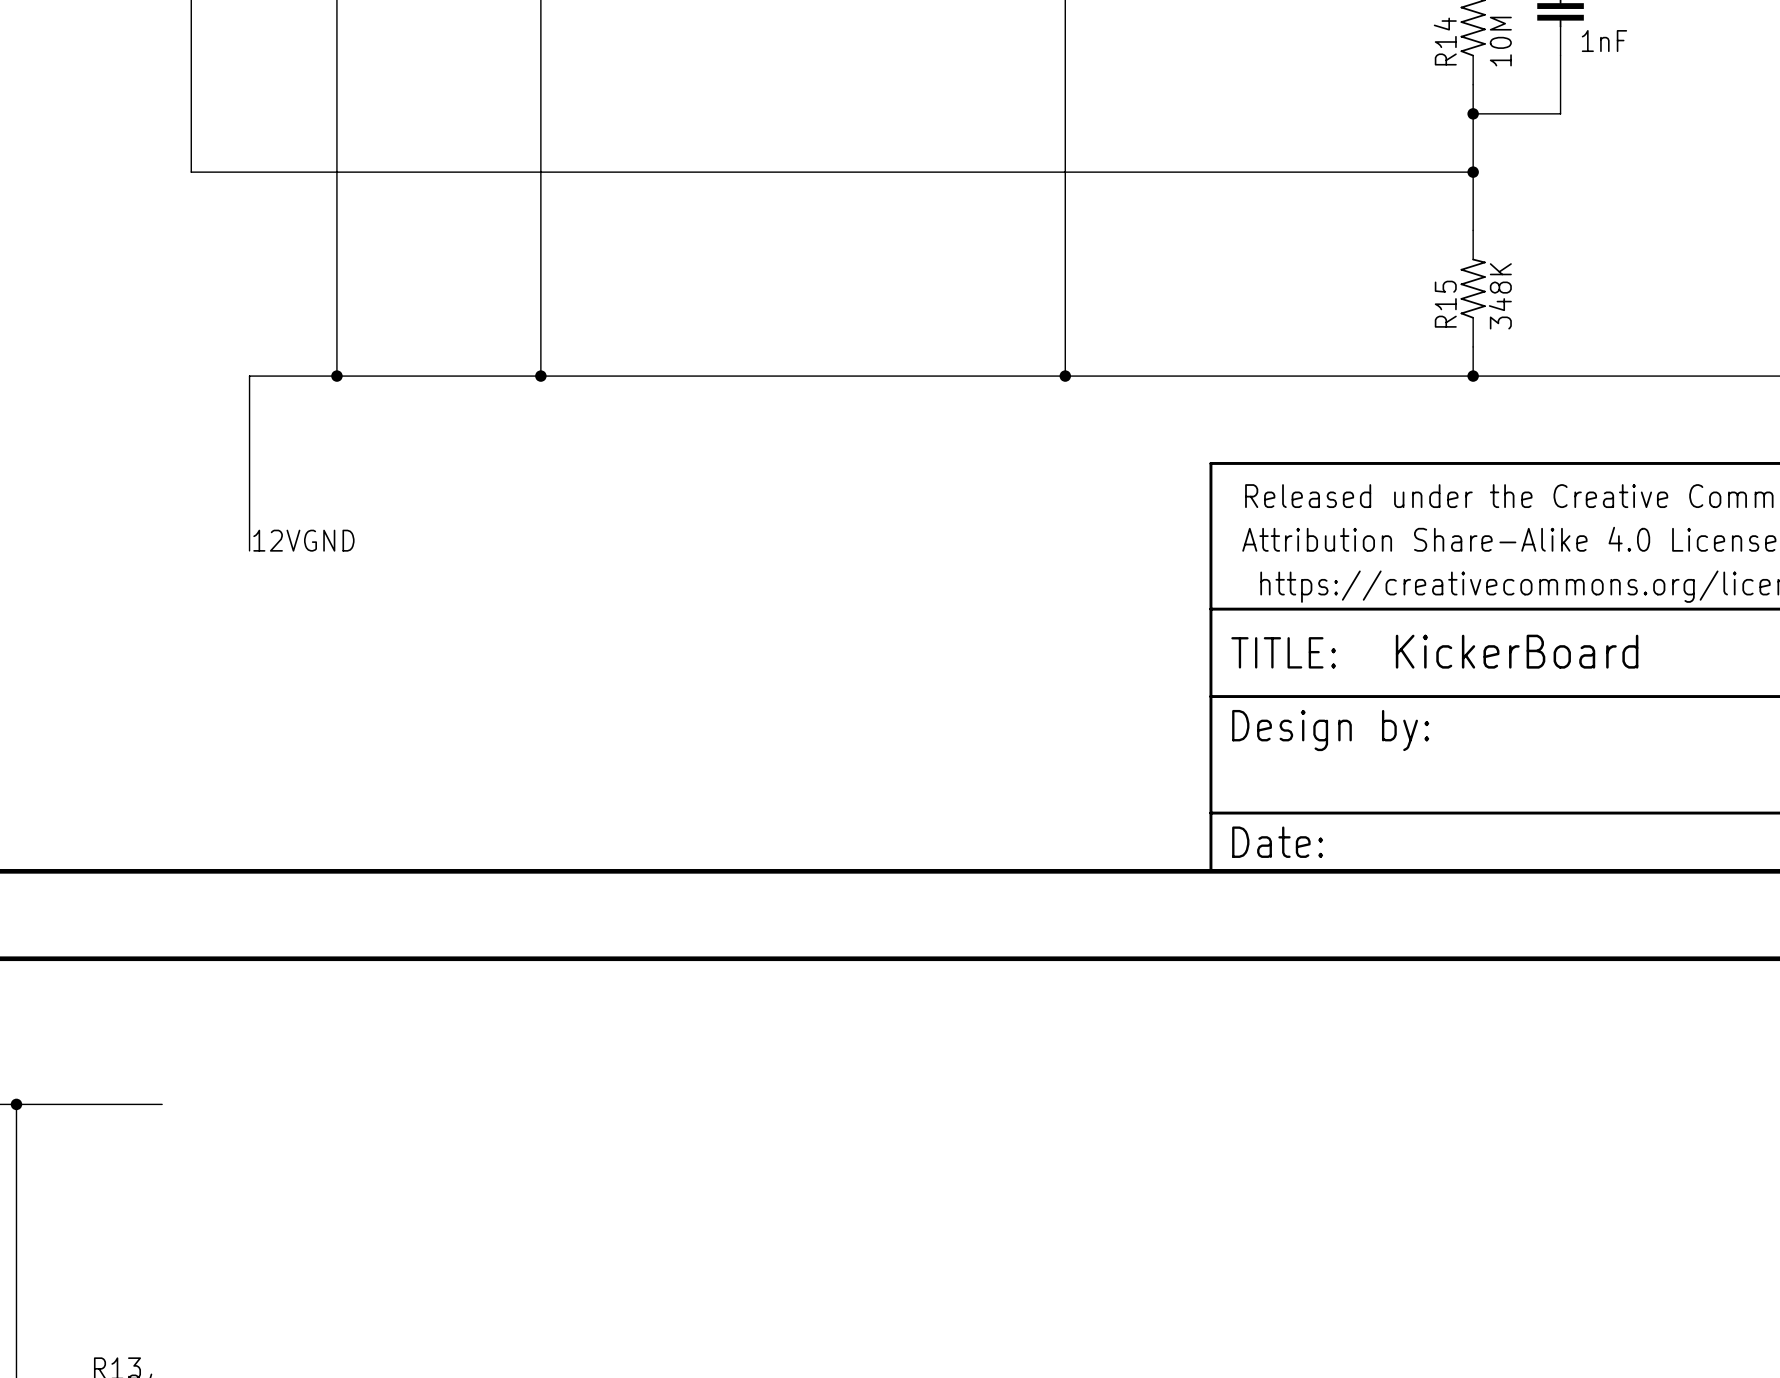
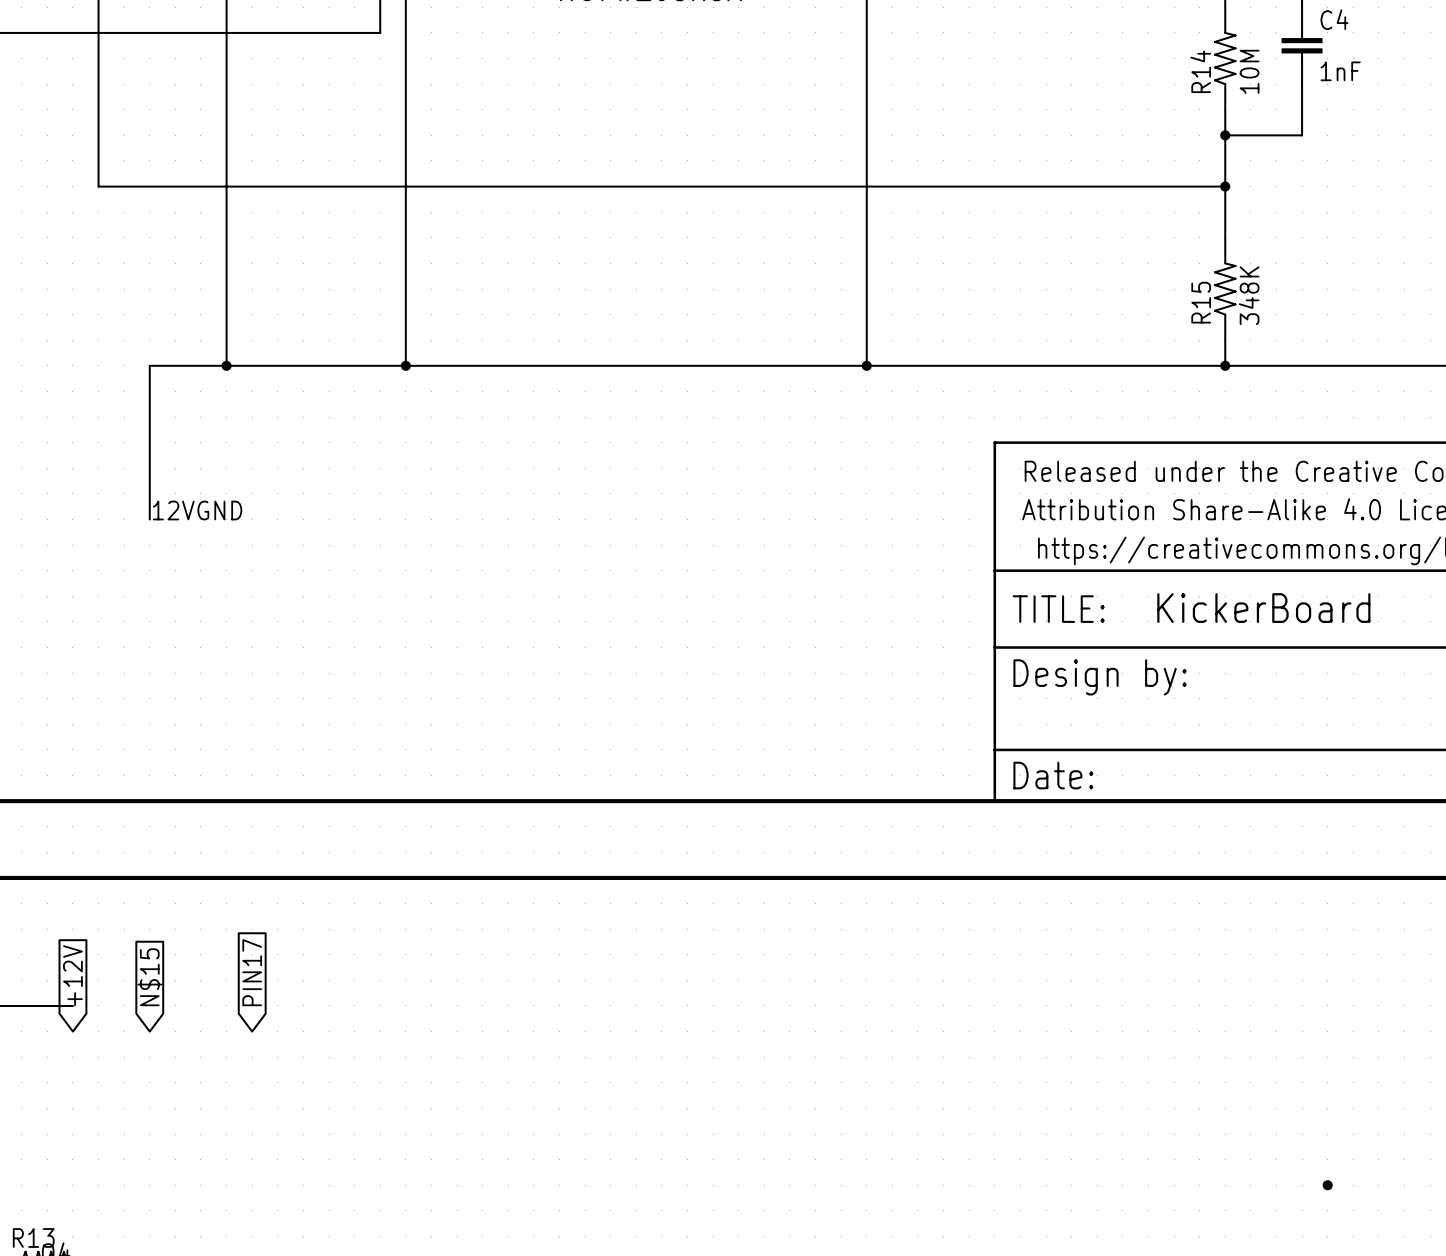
global label: none -> PIN17 (252, 972)
global label: none -> +12V (72, 975)
global label: none -> N$15 (149, 977)
junction: none -> (1327, 1185)

